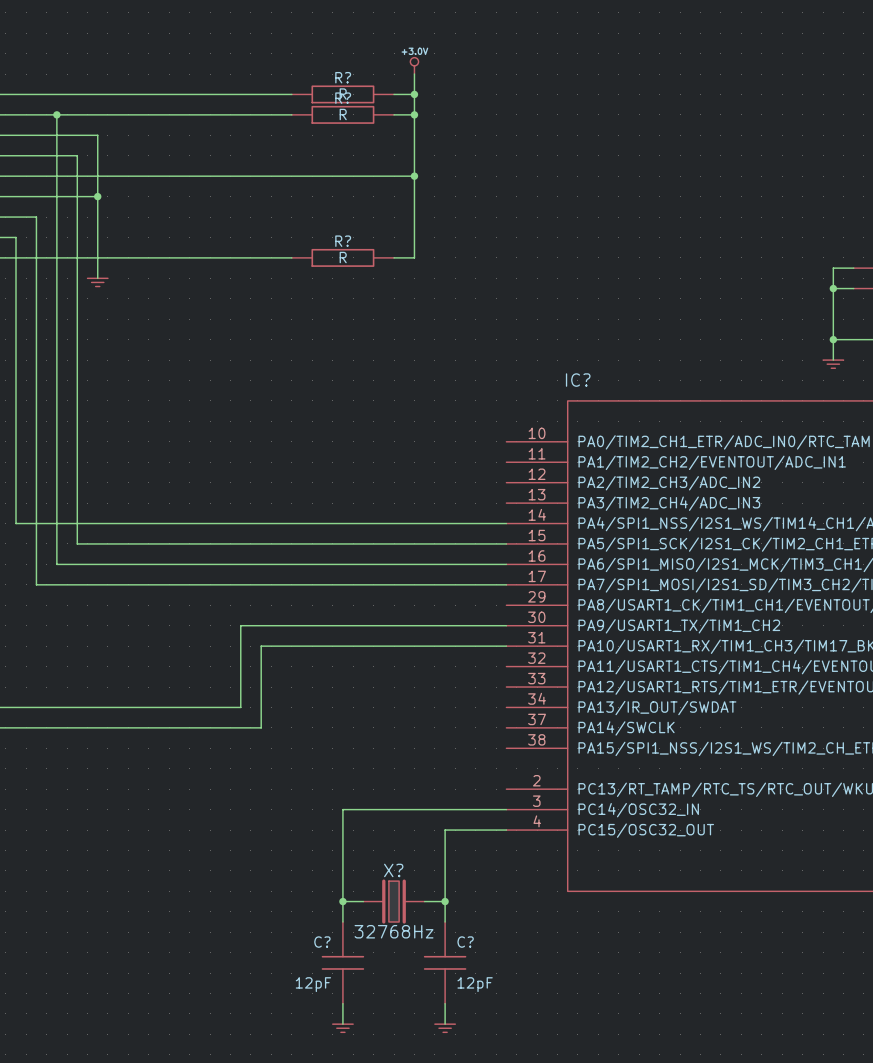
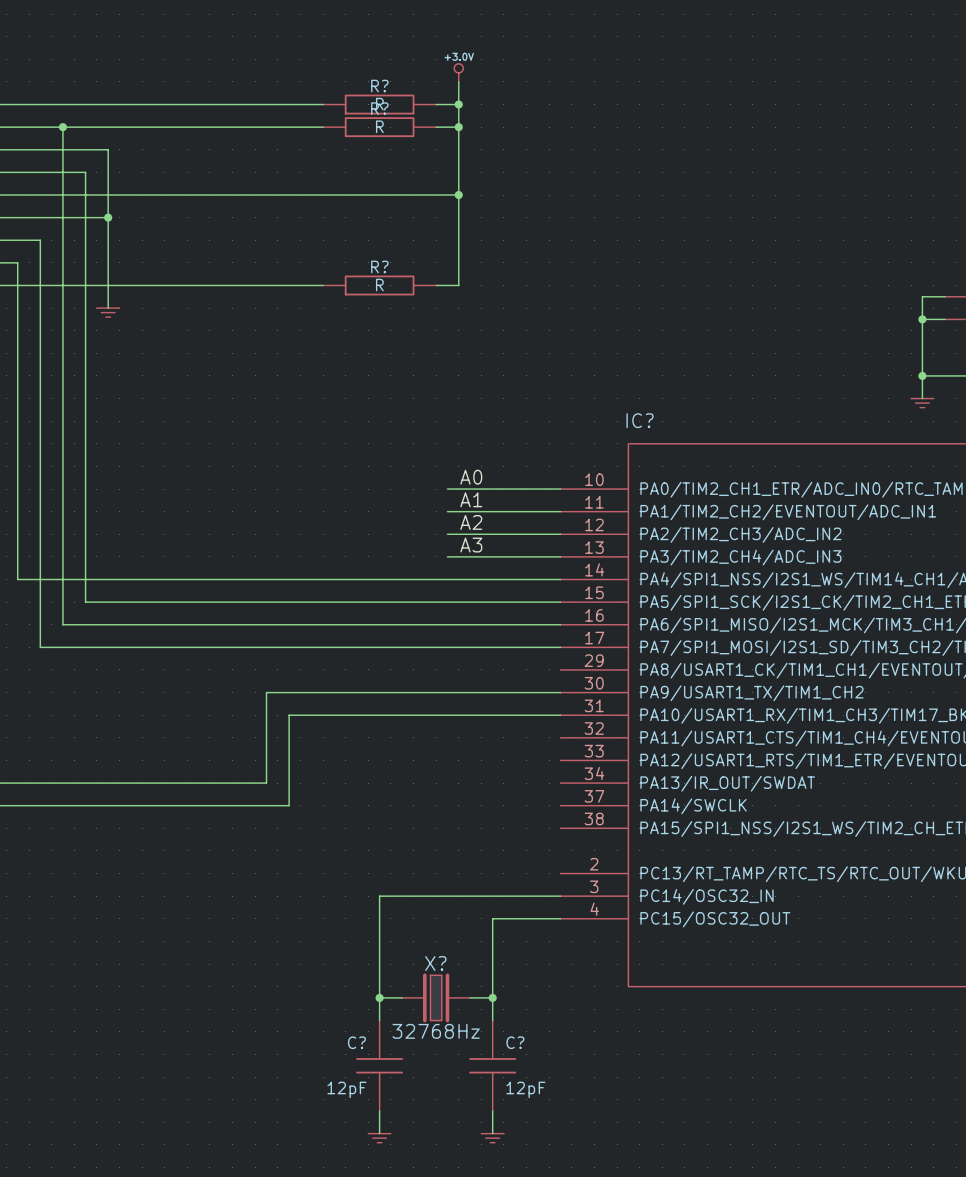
label: none -> A0 (471, 477)
wire: none -> (447, 489) (560, 489)
label: none -> A1 (471, 499)
wire: none -> (447, 511) (560, 511)
label: none -> A2 (471, 522)
wire: none -> (447, 534) (560, 534)
label: none -> A3 (471, 545)
wire: none -> (447, 556) (560, 556)

